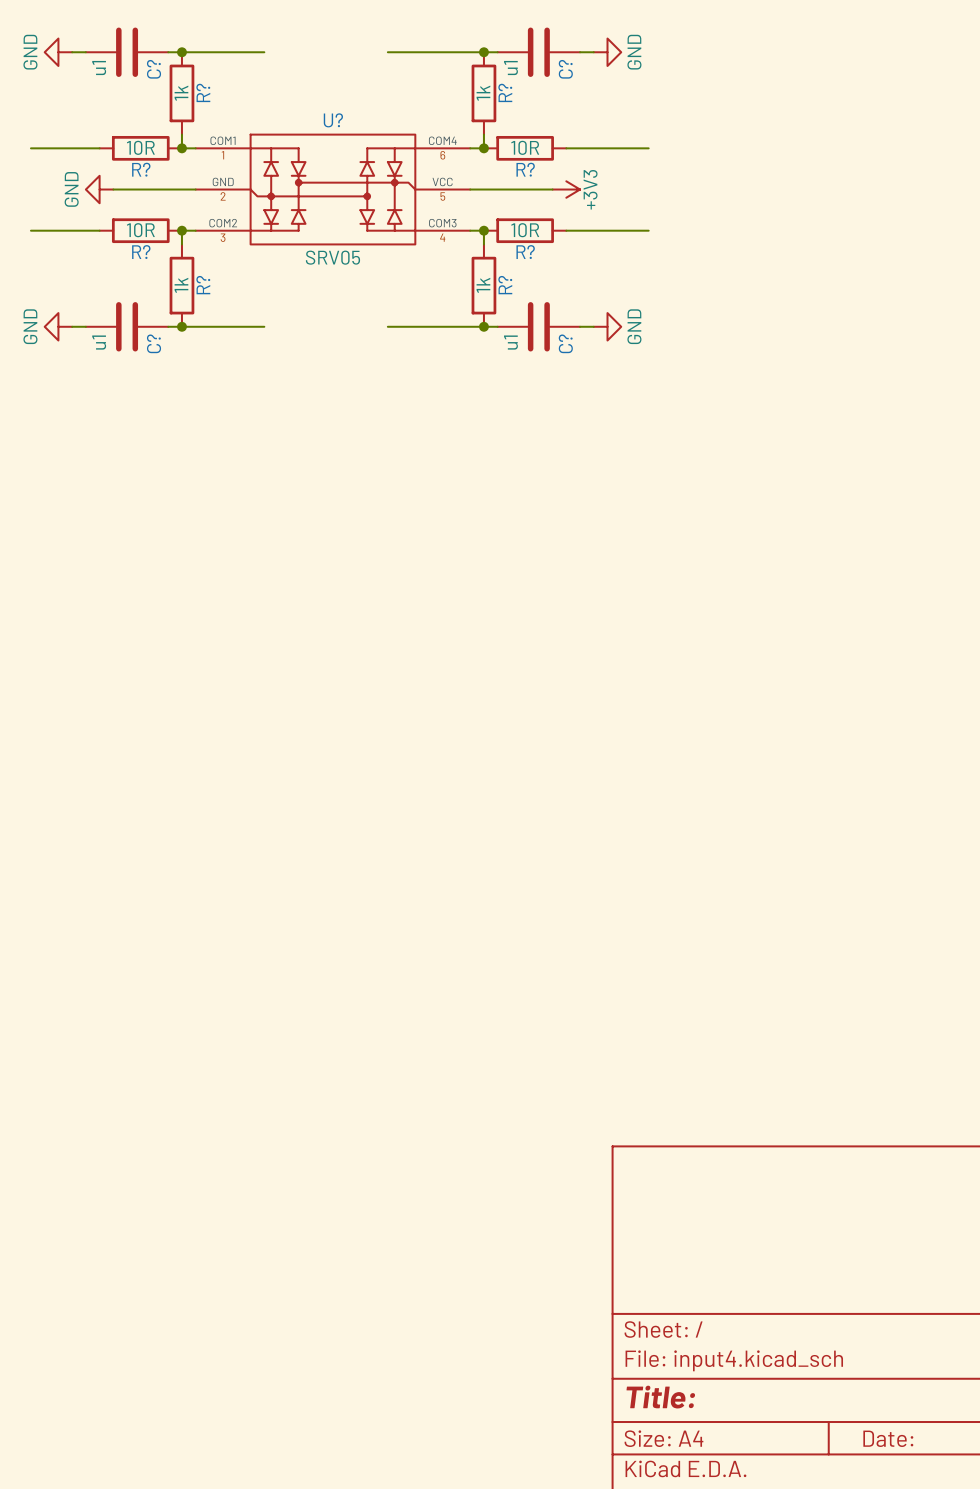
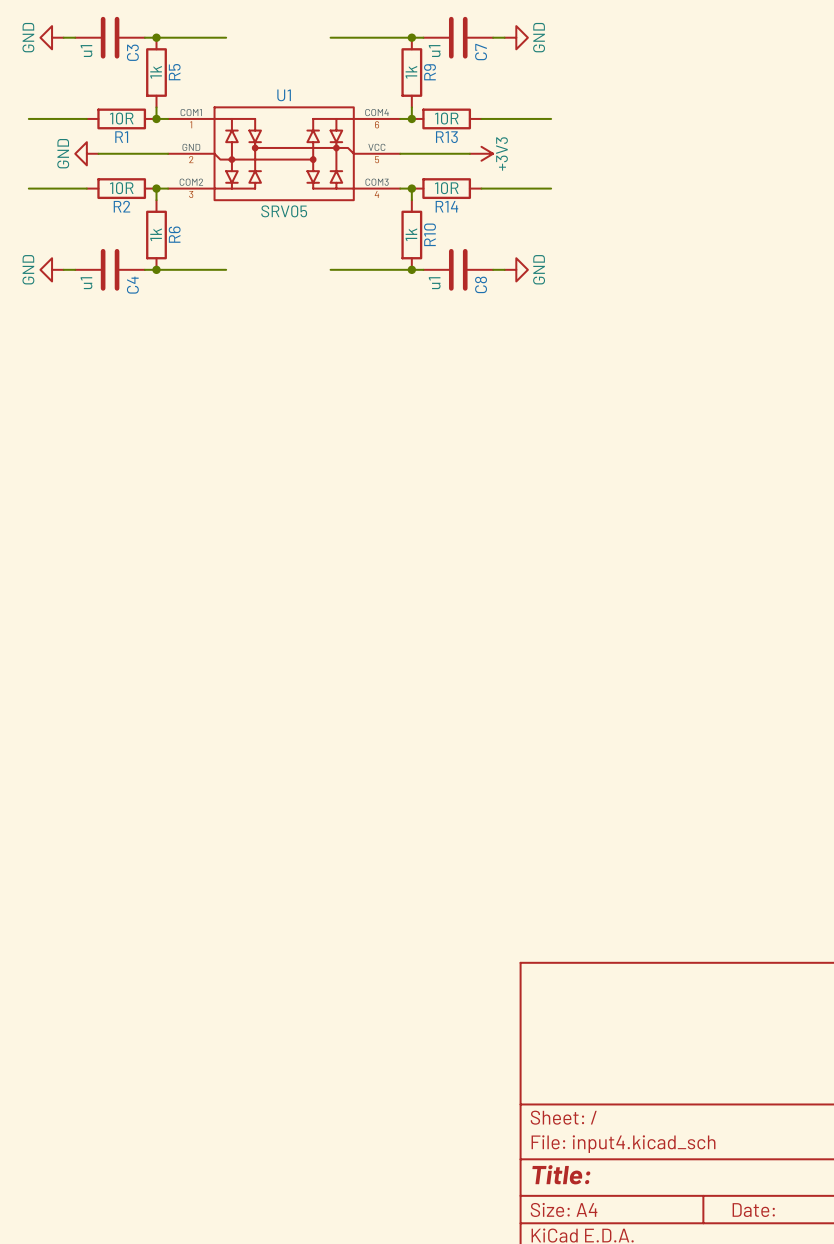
C? name: C? (154, 69) -> C3 (132, 52)
C? name: C? (565, 69) -> C7 (481, 52)
R? name: R? (203, 92) -> R5 (174, 72)
R? name: R? (505, 92) -> R9 (429, 72)
U? name: U? (333, 120) -> U1 (284, 95)
R? name: R? (141, 169) -> R1 (121, 137)
R? name: R? (525, 169) -> R13 (446, 137)
R? name: R? (141, 252) -> R2 (121, 206)
R? name: R? (525, 252) -> R14 (446, 206)
R? name: R? (203, 285) -> R6 (174, 234)
R? name: R? (505, 285) -> R10 (429, 234)
C? name: C? (154, 343) -> C4 (132, 285)
C? name: C? (565, 343) -> C8 (481, 284)

